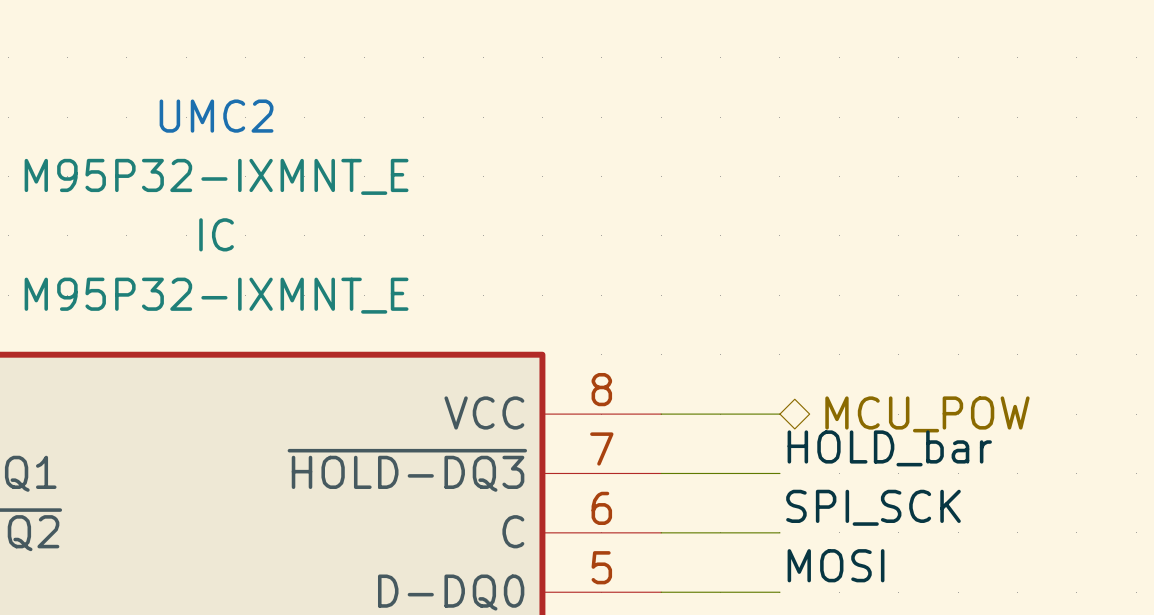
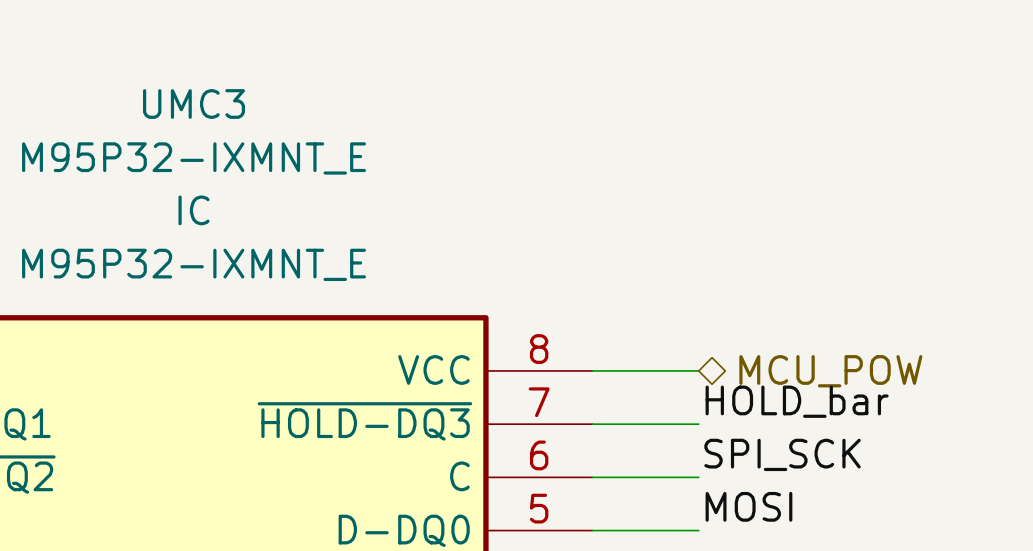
UMC2 name: UMC2 (216, 116) -> UMC3 (194, 103)

